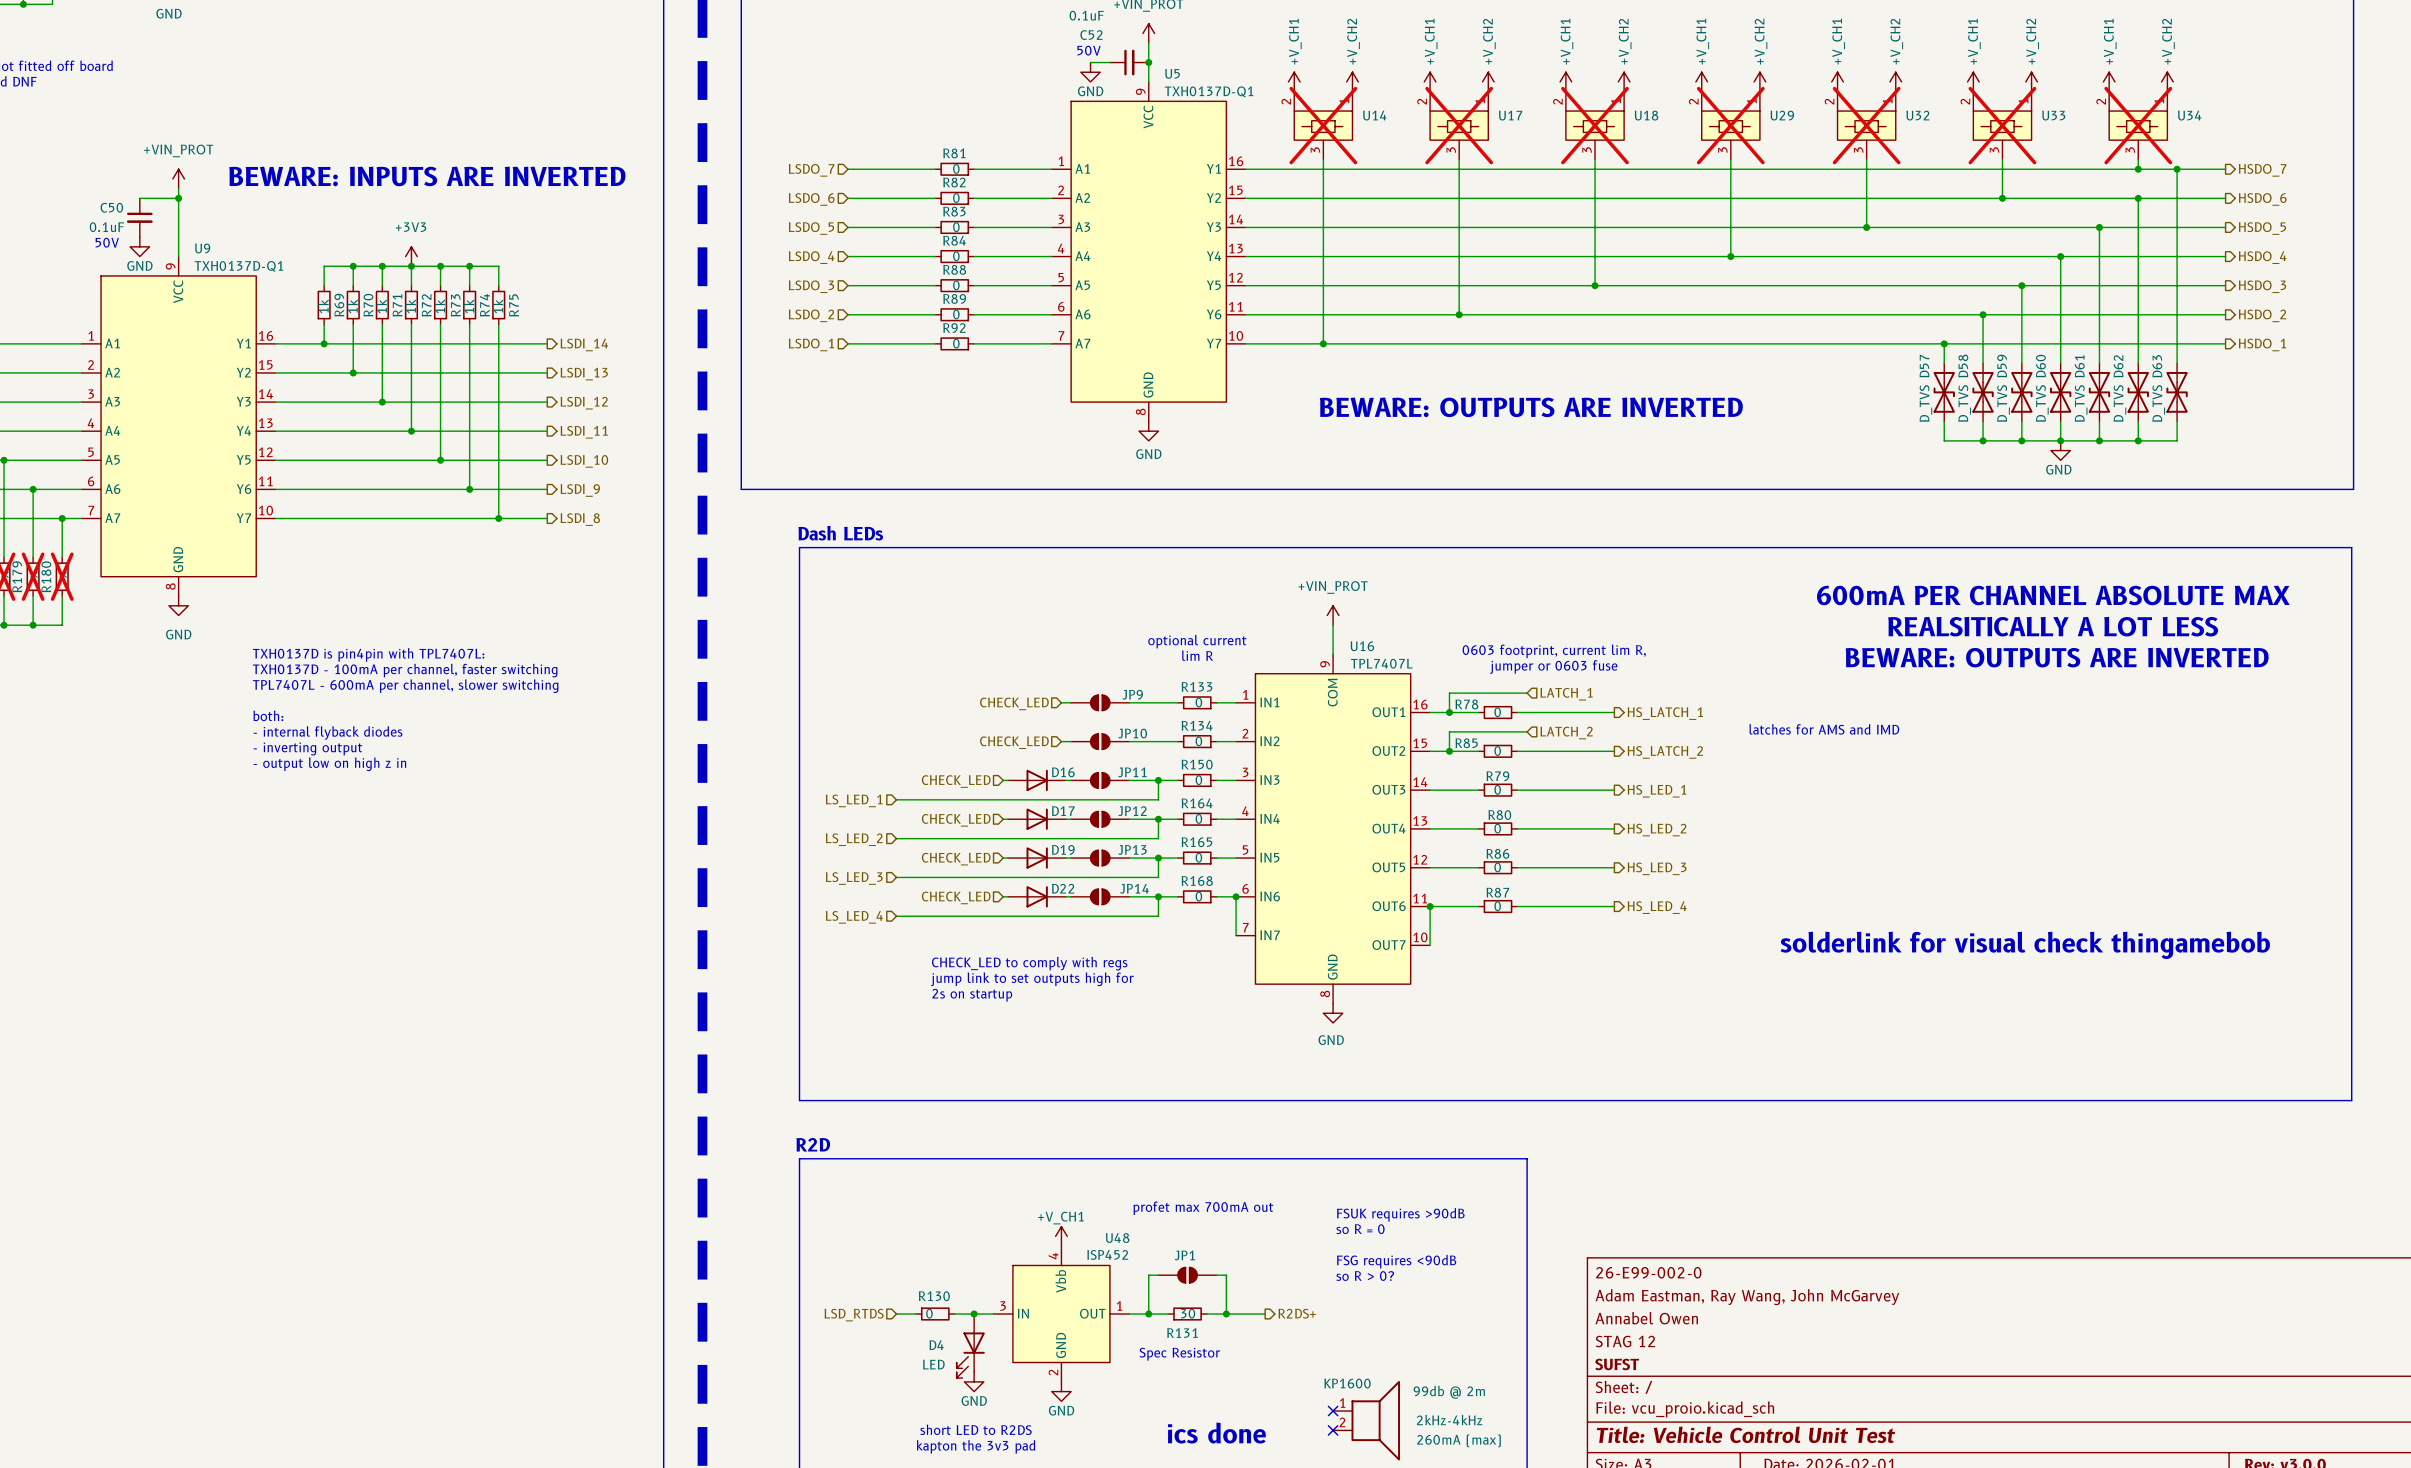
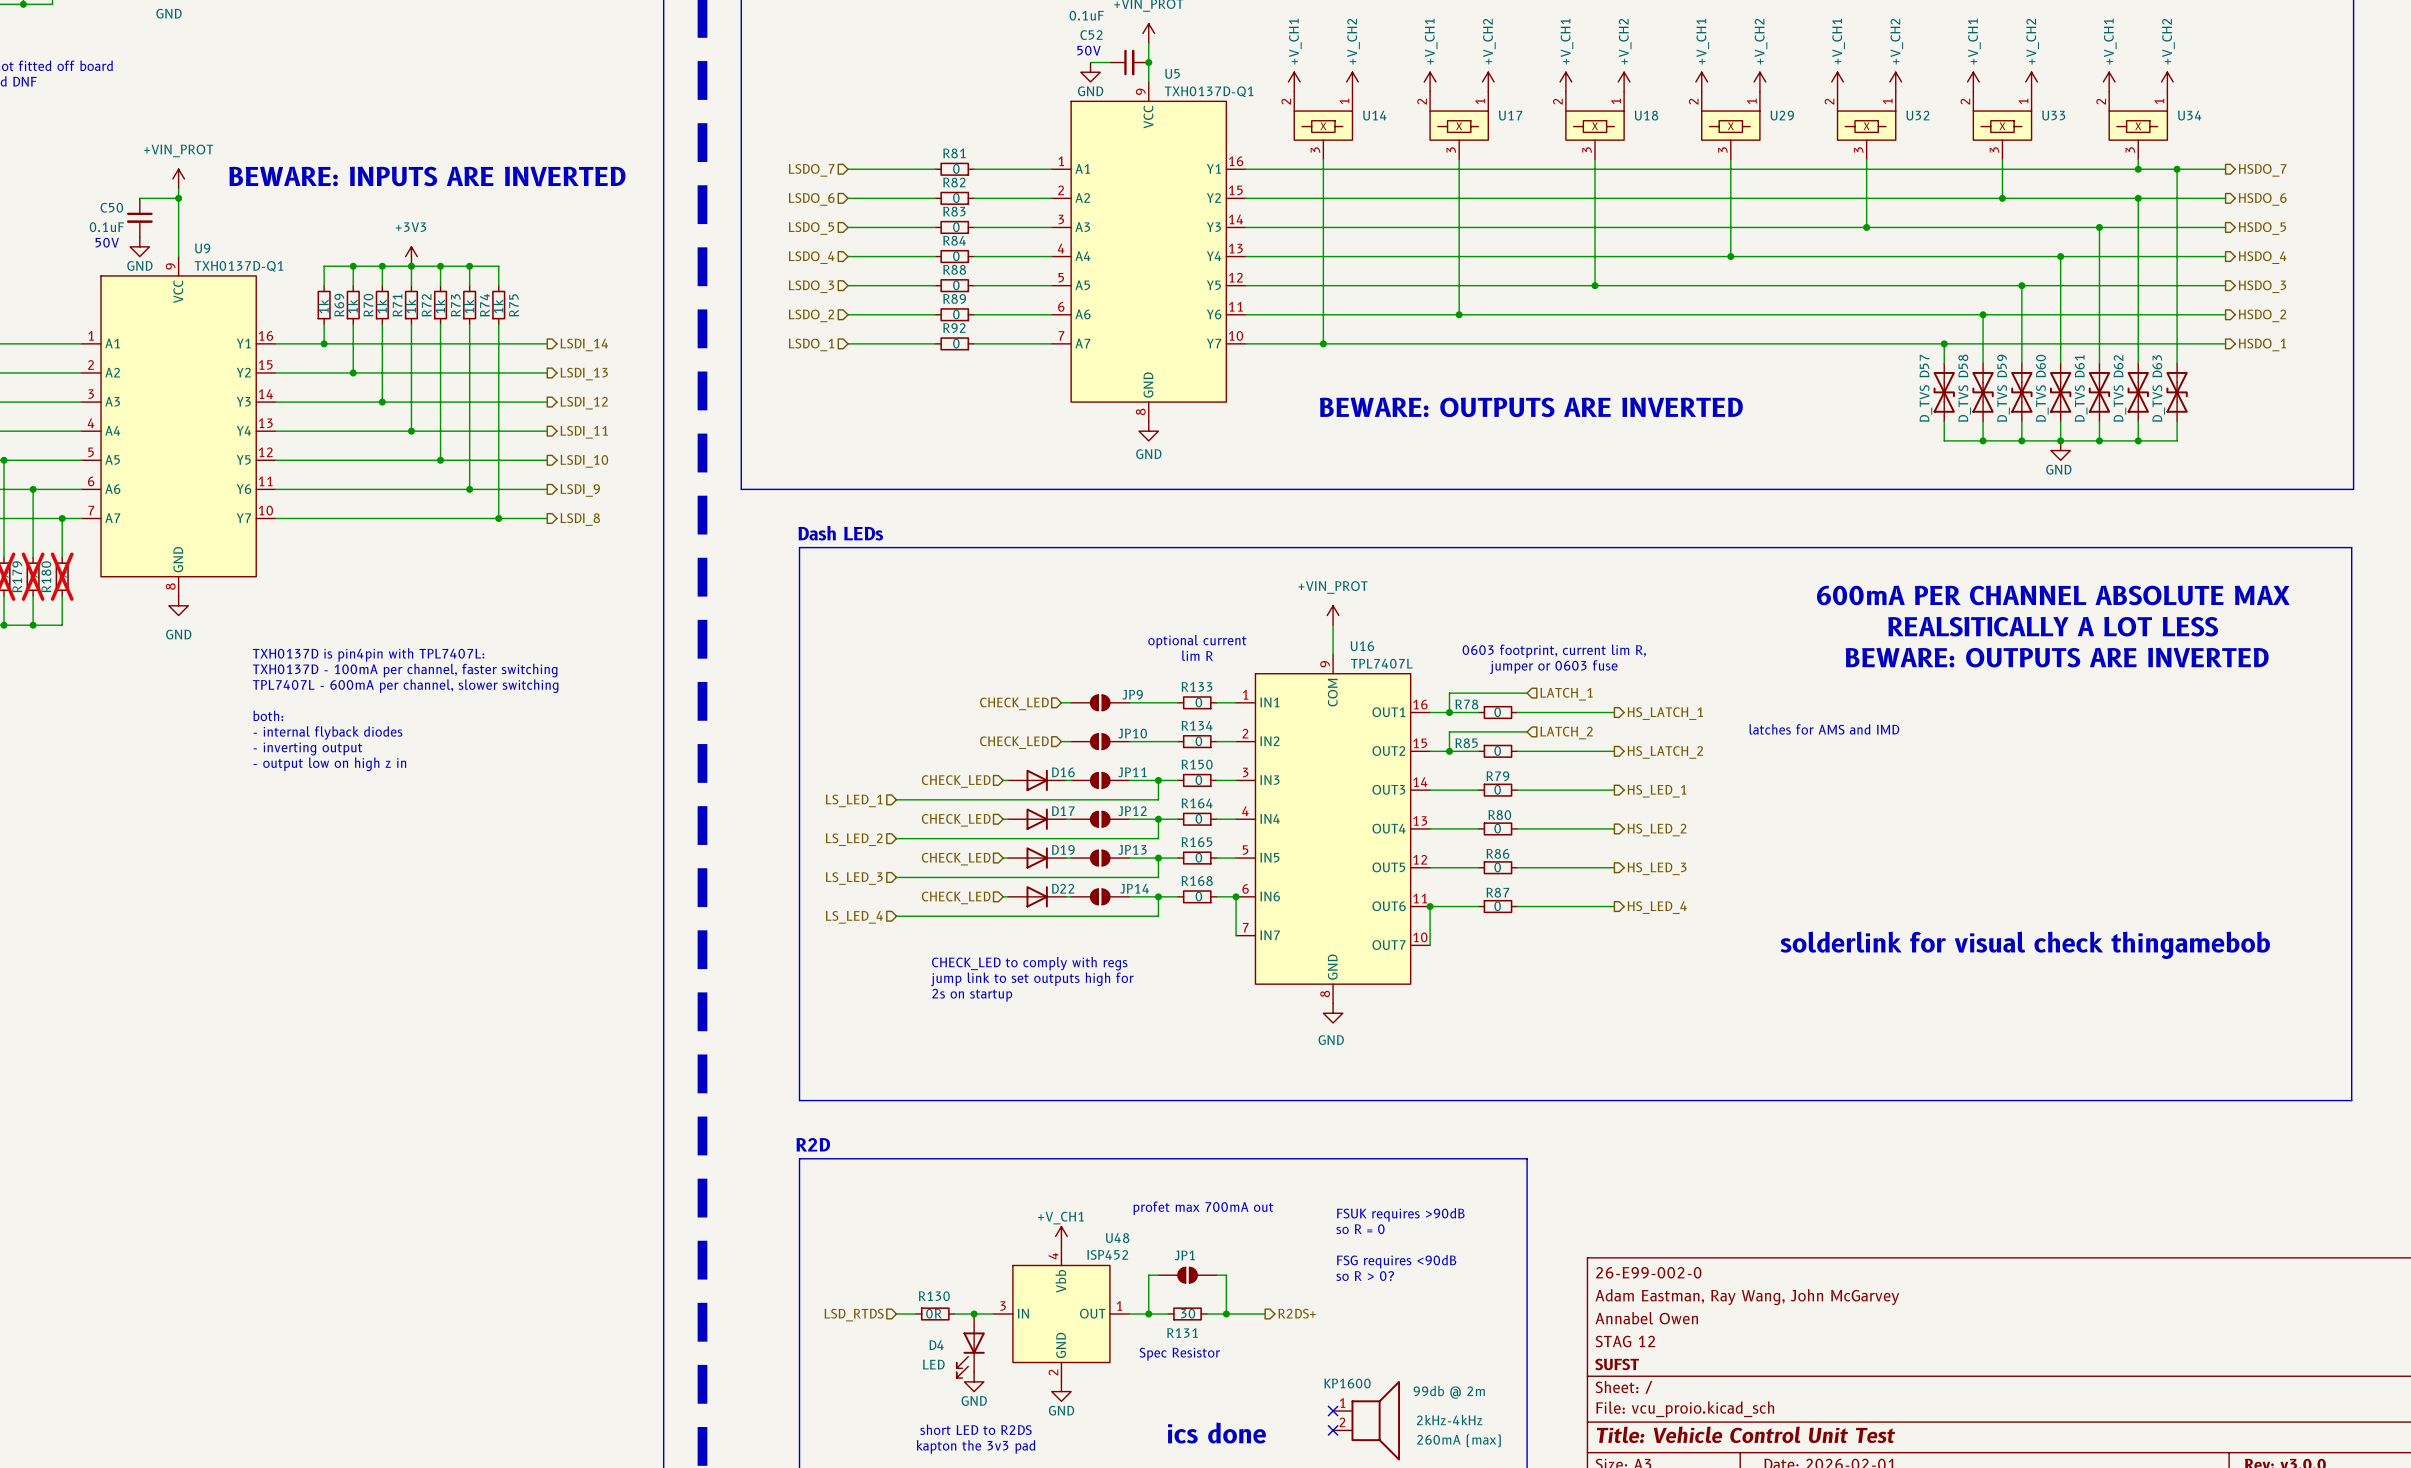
U14 do-not-place cross: (1323, 125) -> none
U17 do-not-place cross: (1459, 125) -> none
U18 do-not-place cross: (1595, 125) -> none
U29 do-not-place cross: (1730, 125) -> none
U32 do-not-place cross: (1866, 125) -> none
U33 do-not-place cross: (2002, 125) -> none
U34 do-not-place cross: (2138, 125) -> none
R130 value: 0 (929, 1313) -> 0R (933, 1313)

